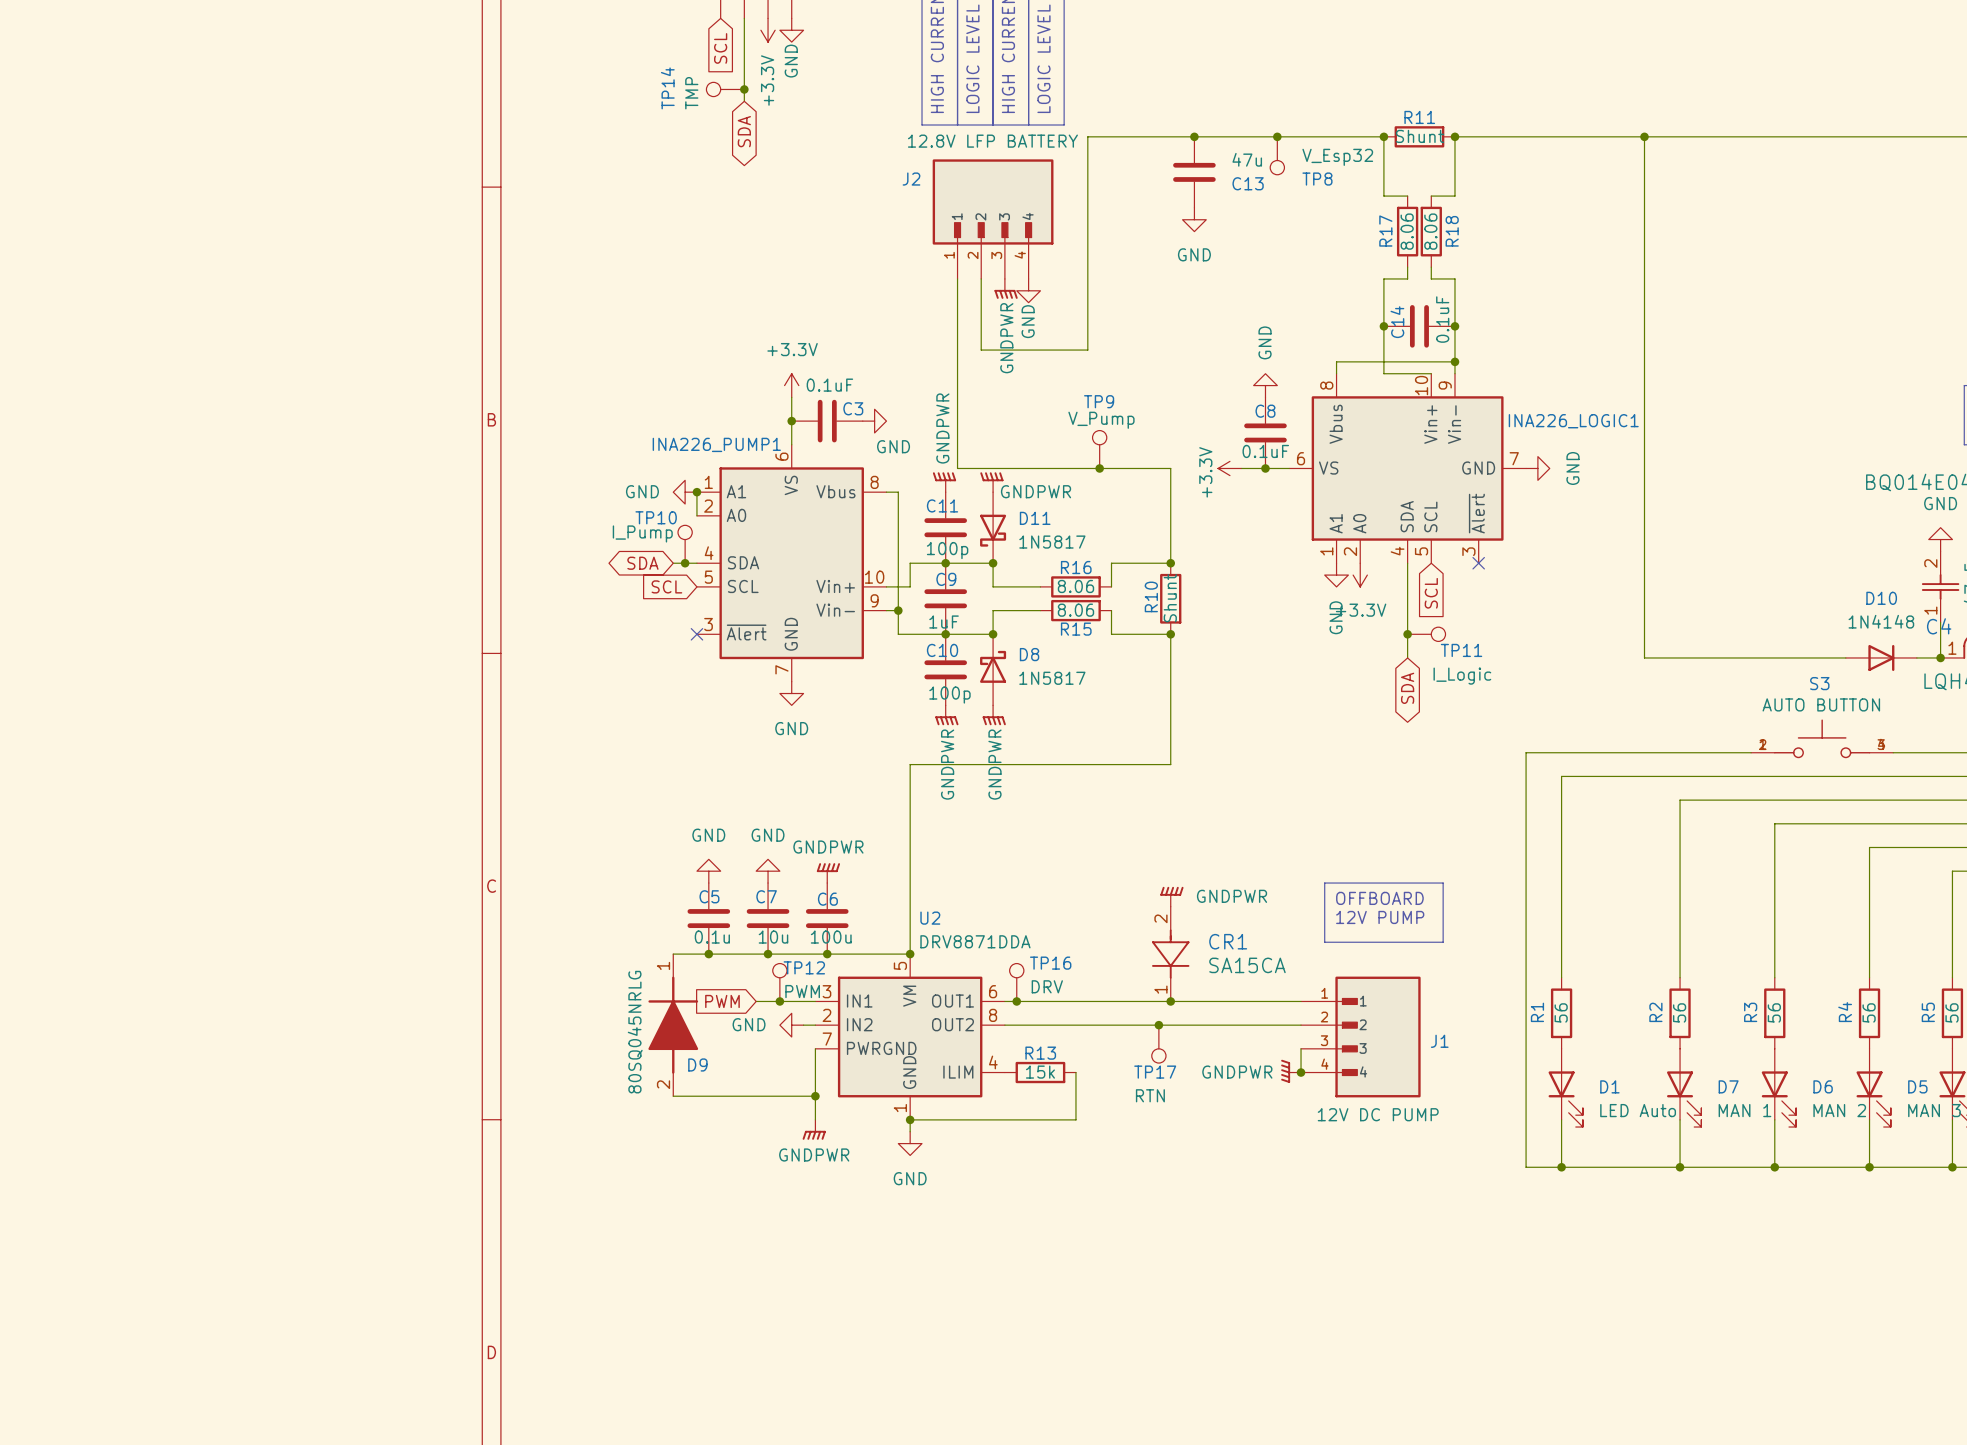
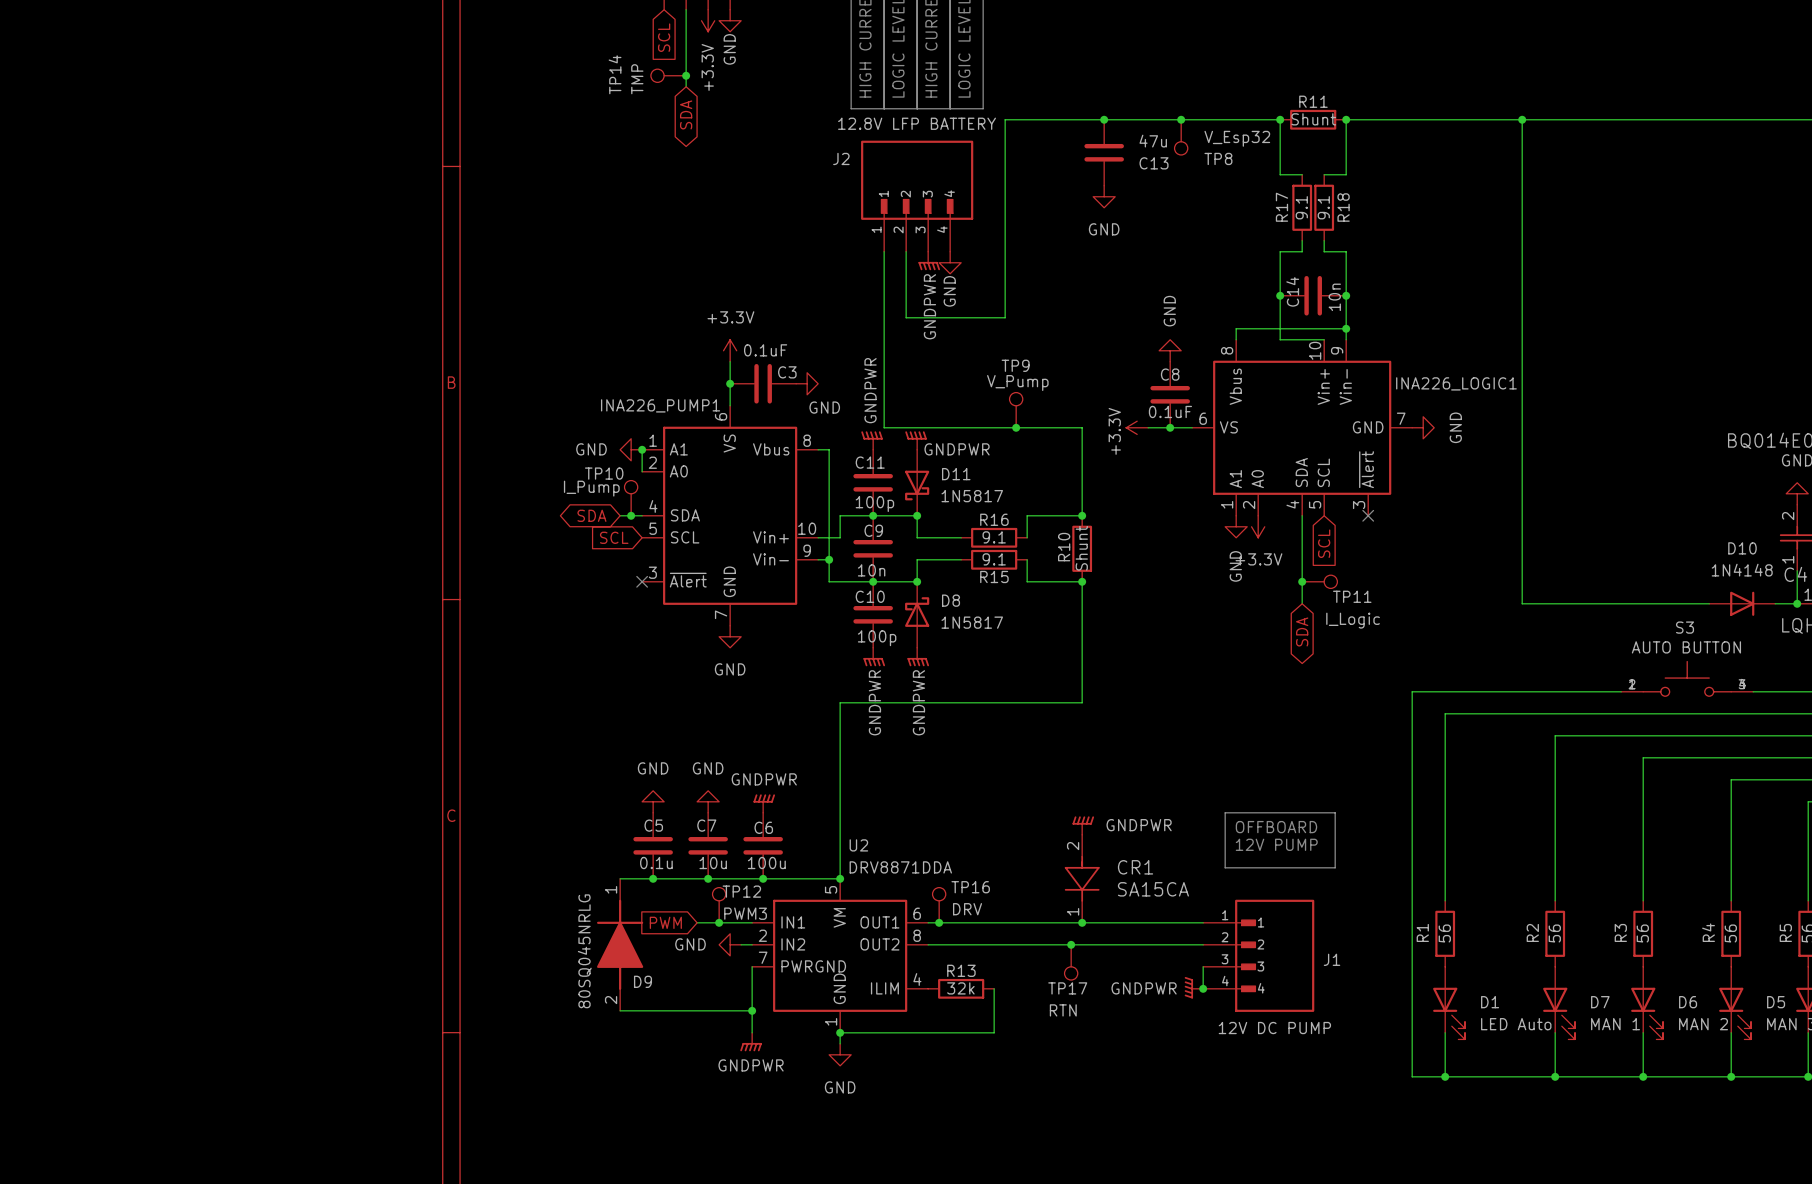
R17 value: 8.06 (1407, 231) -> 9.1 (1301, 207)
R18 value: 8.06 (1430, 231) -> 9.1 (1323, 207)
C14 value: 0.1uF (1442, 319) -> 10n (1334, 297)
R16 value: 8.06 (1075, 586) -> 9.1 (994, 537)
R15 value: 8.06 (1075, 610) -> 9.1 (994, 559)
C9 value: 1uF (944, 622) -> 10n (871, 570)
R13 value: 15k (1040, 1072) -> 32k (960, 988)

